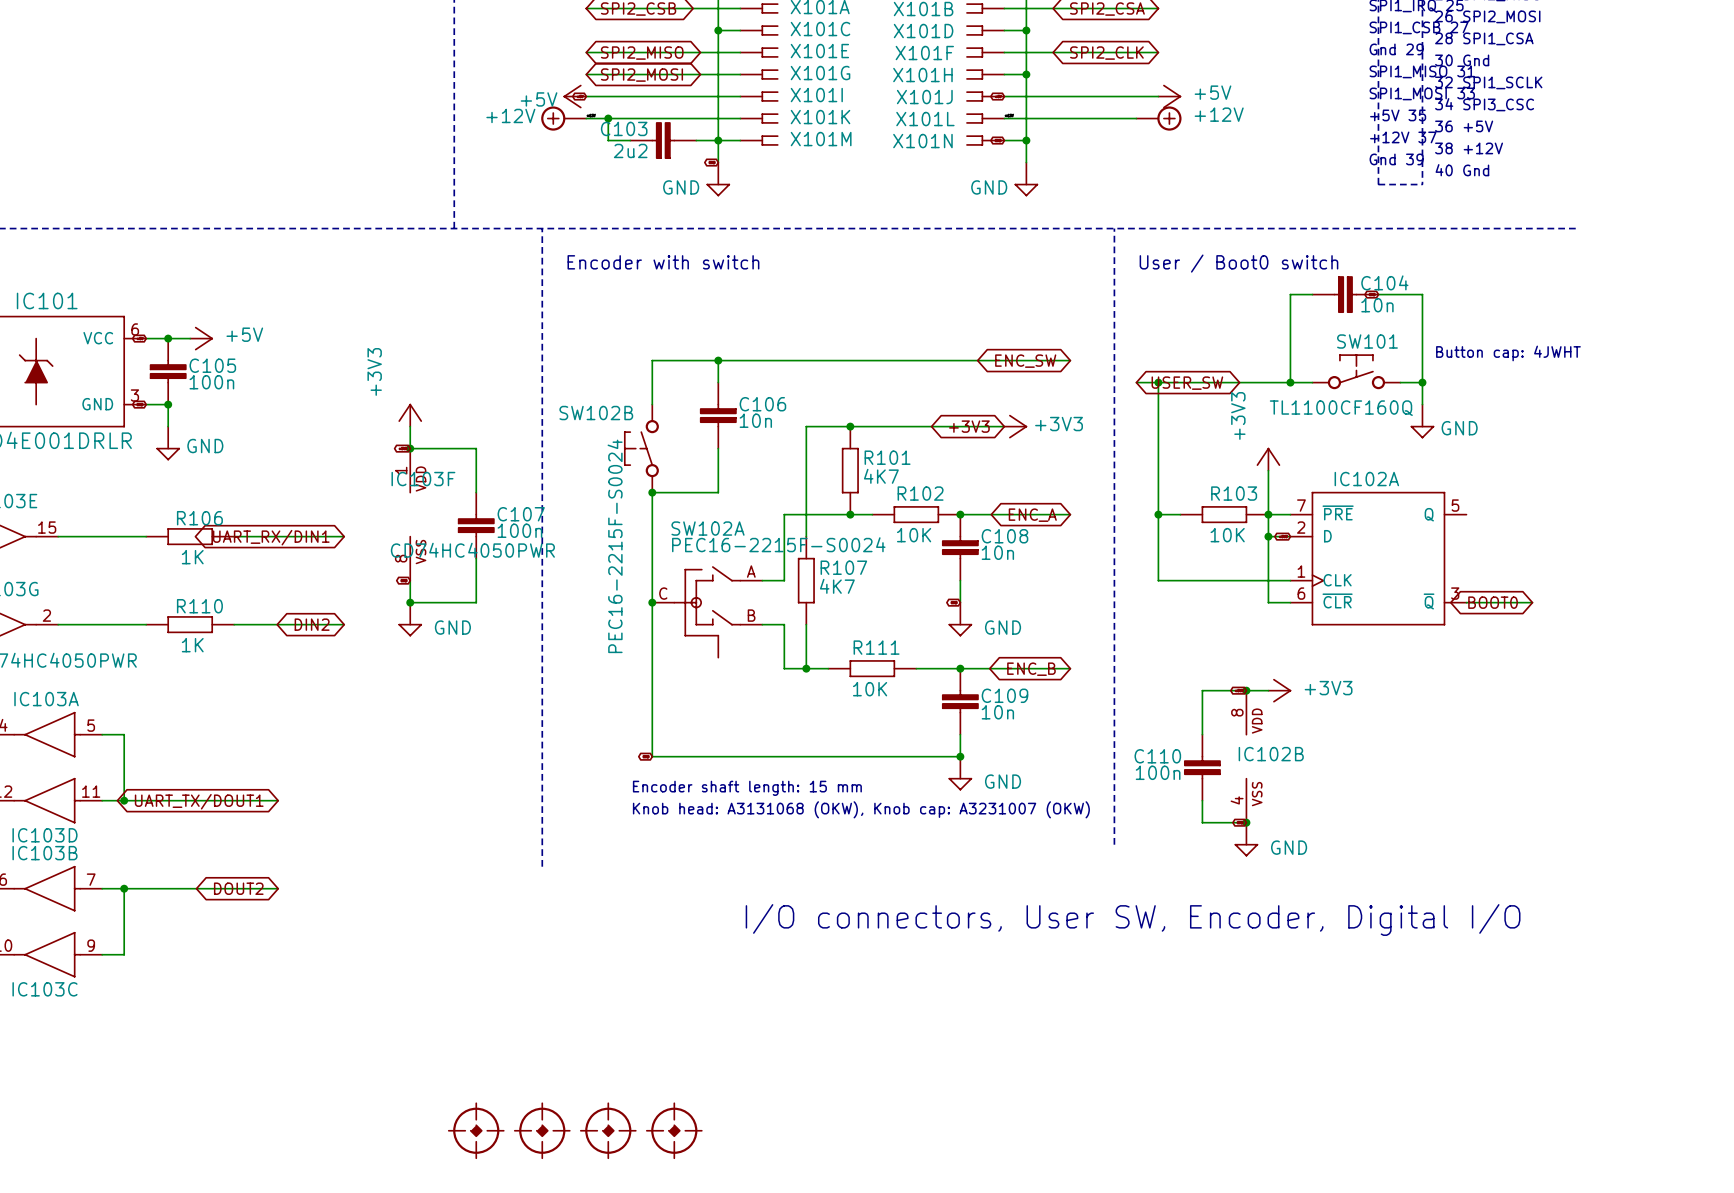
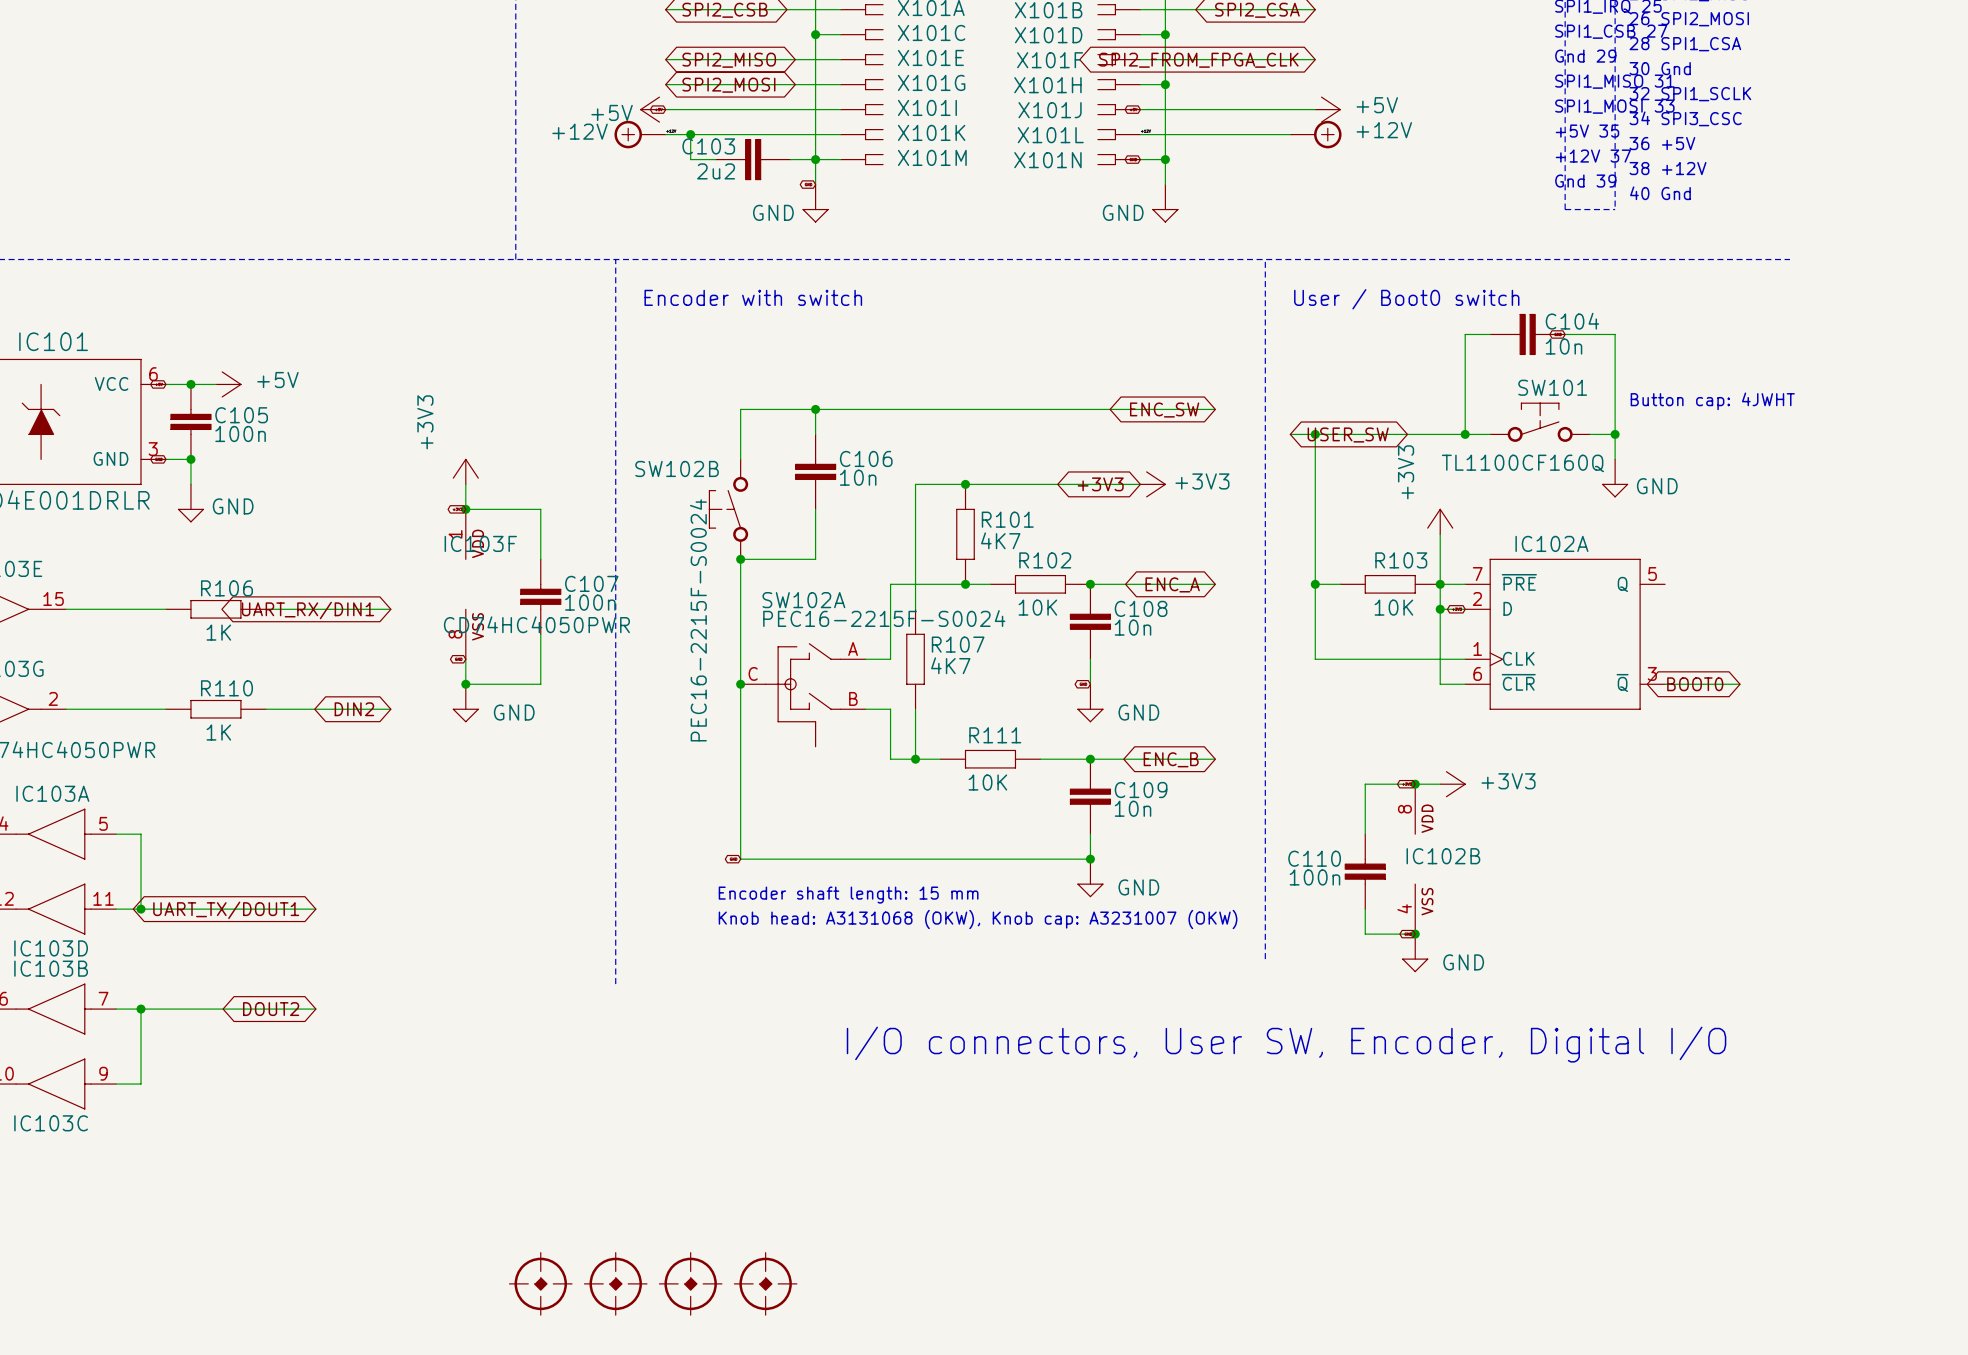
global label: SPI2_CLK (1106, 53) -> SPI2_FROM_FPGA_CLK (1198, 60)

